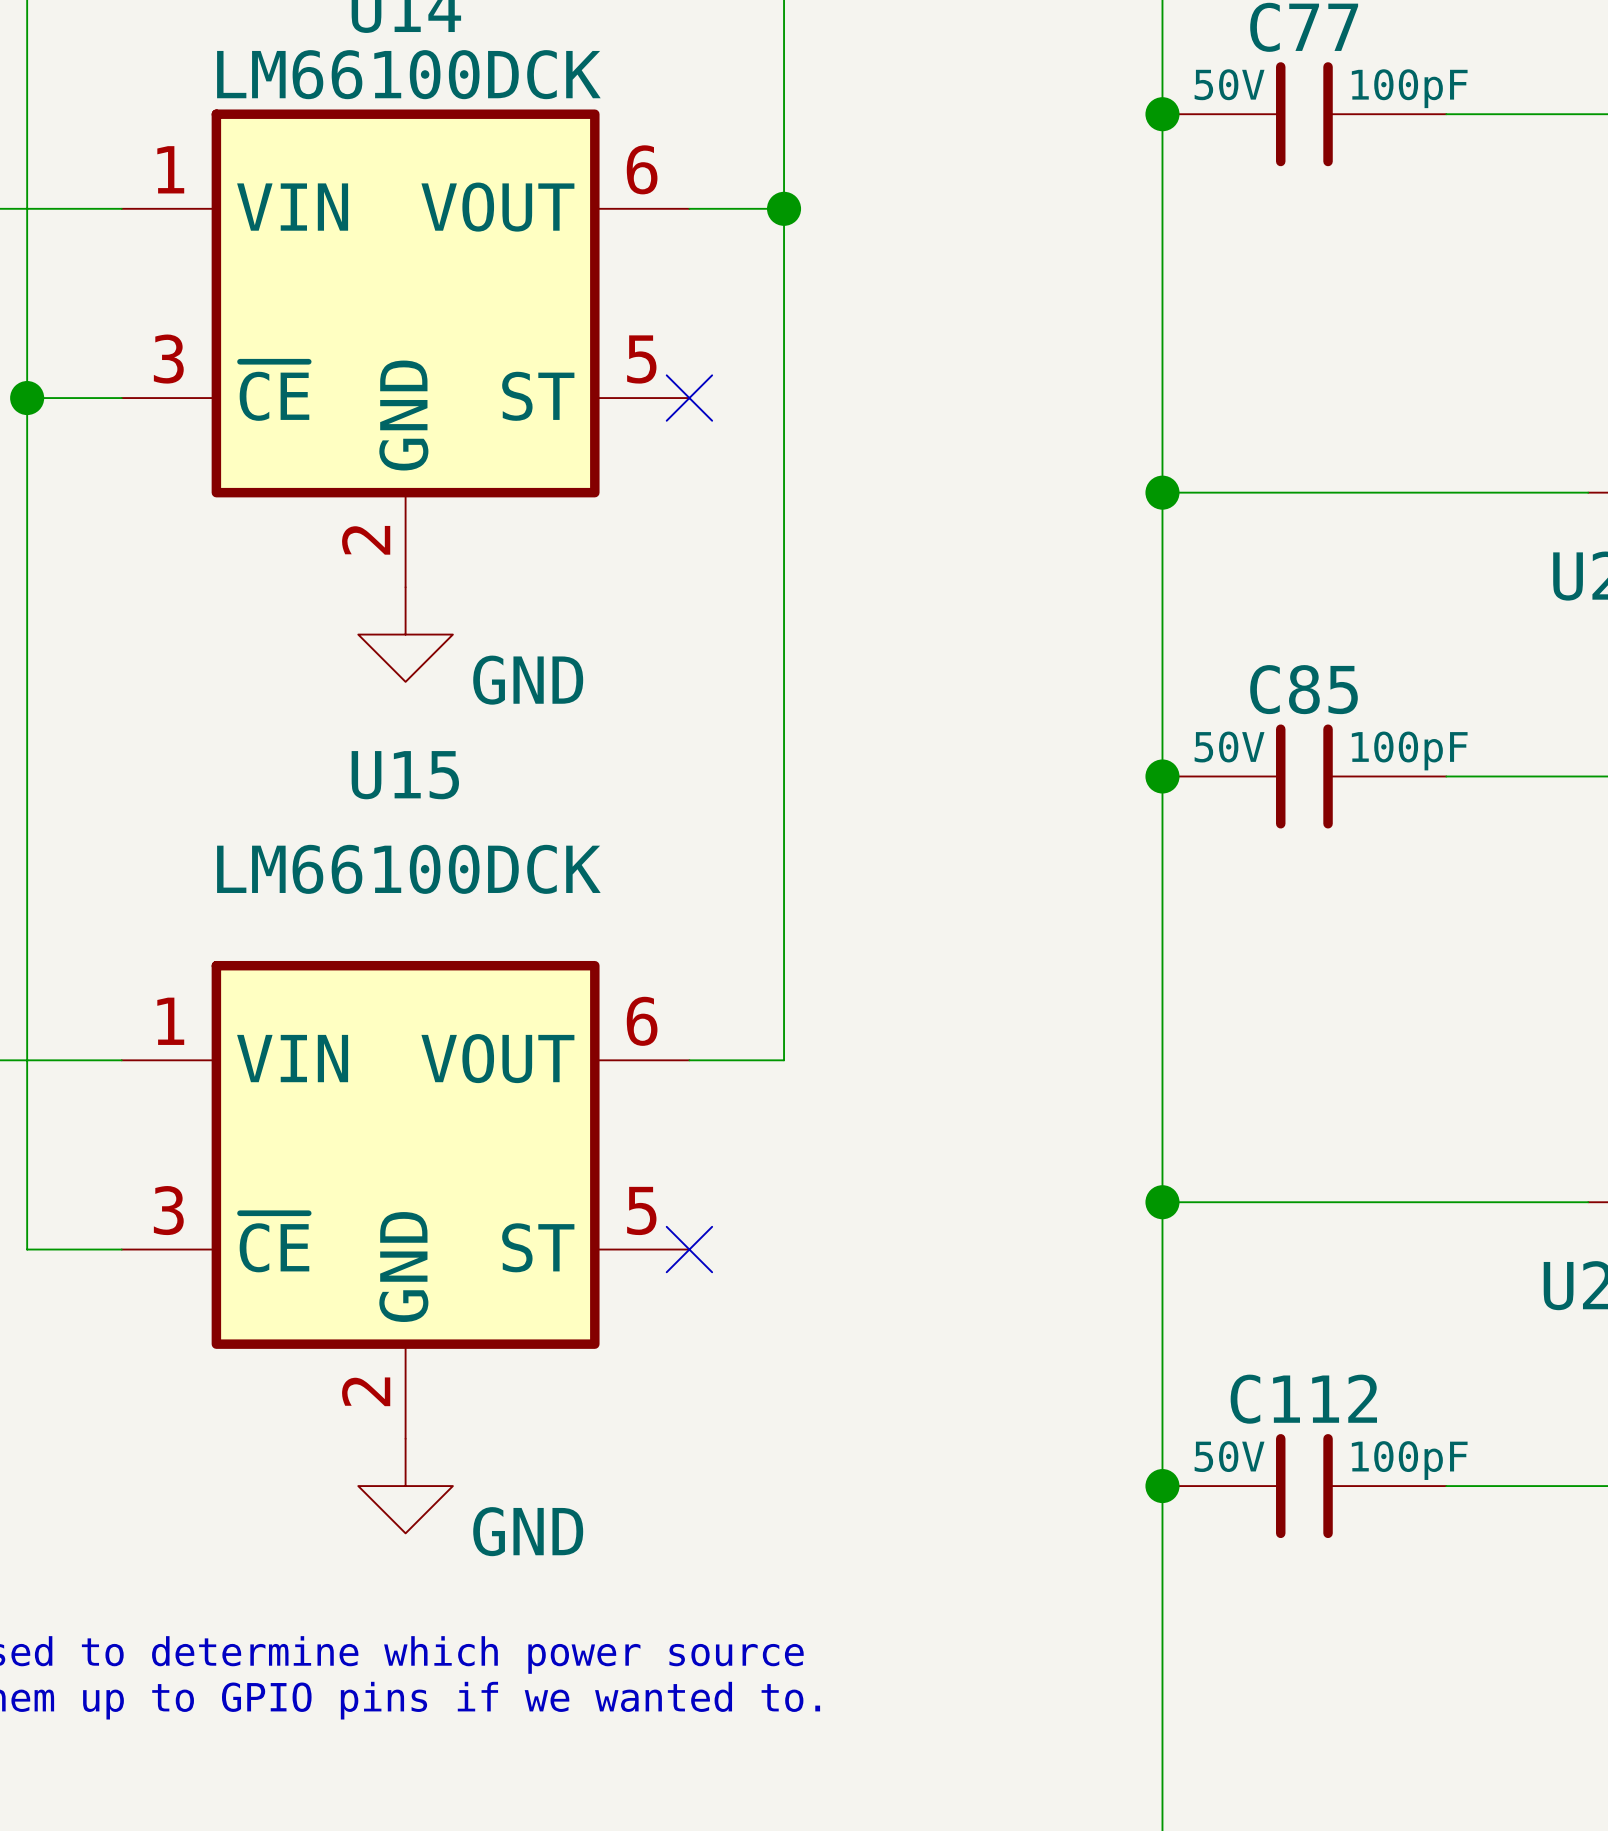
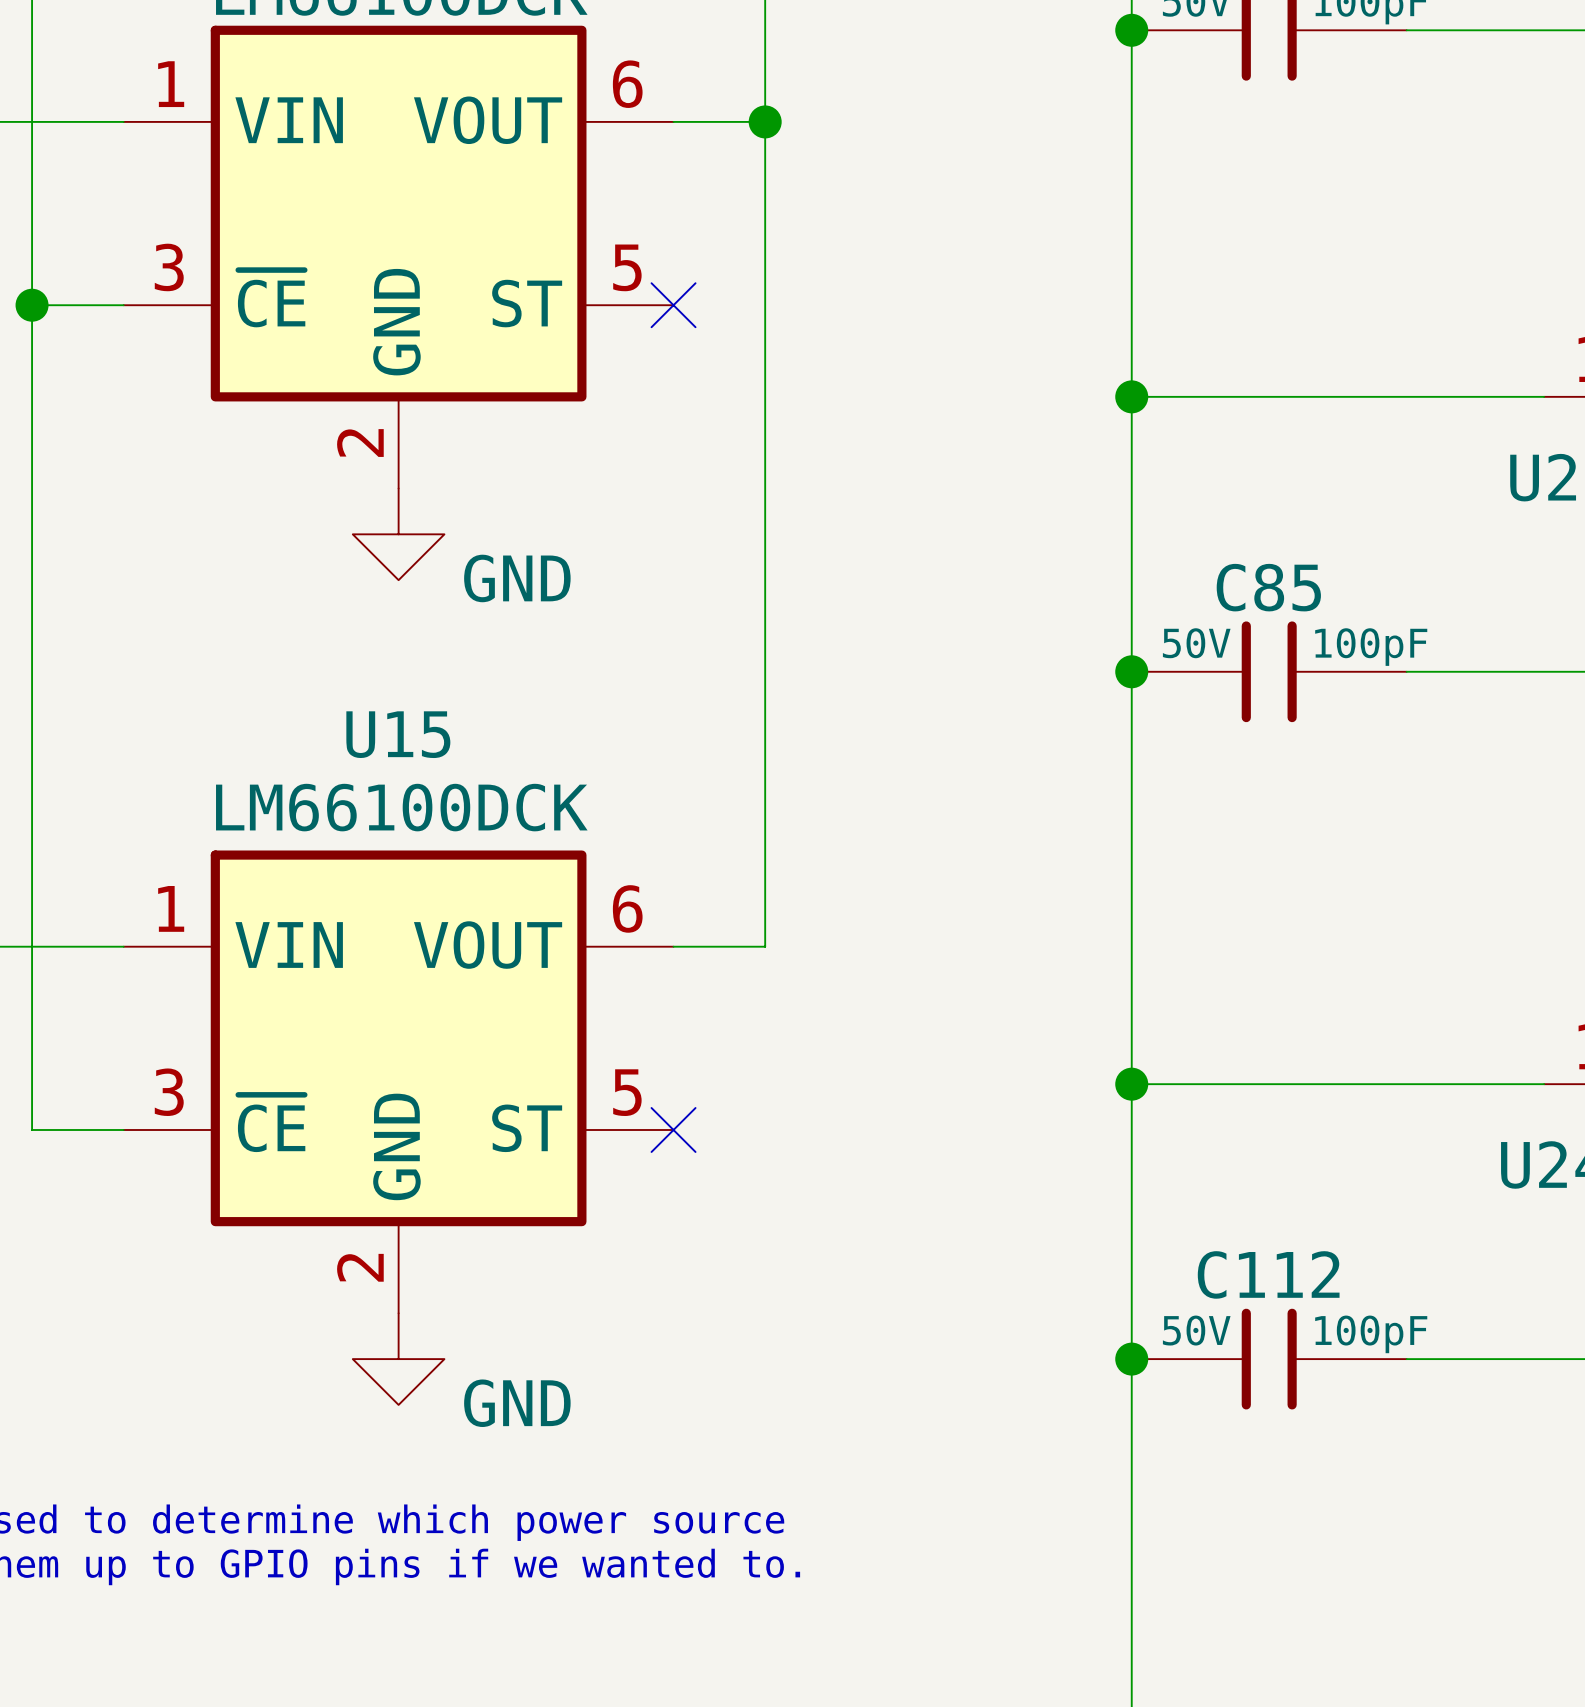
U15 name position: U15 (405, 775) -> U15 (398, 734)
U15 value position: LM66100DCK (408, 869) -> LM66100DCK (401, 807)

